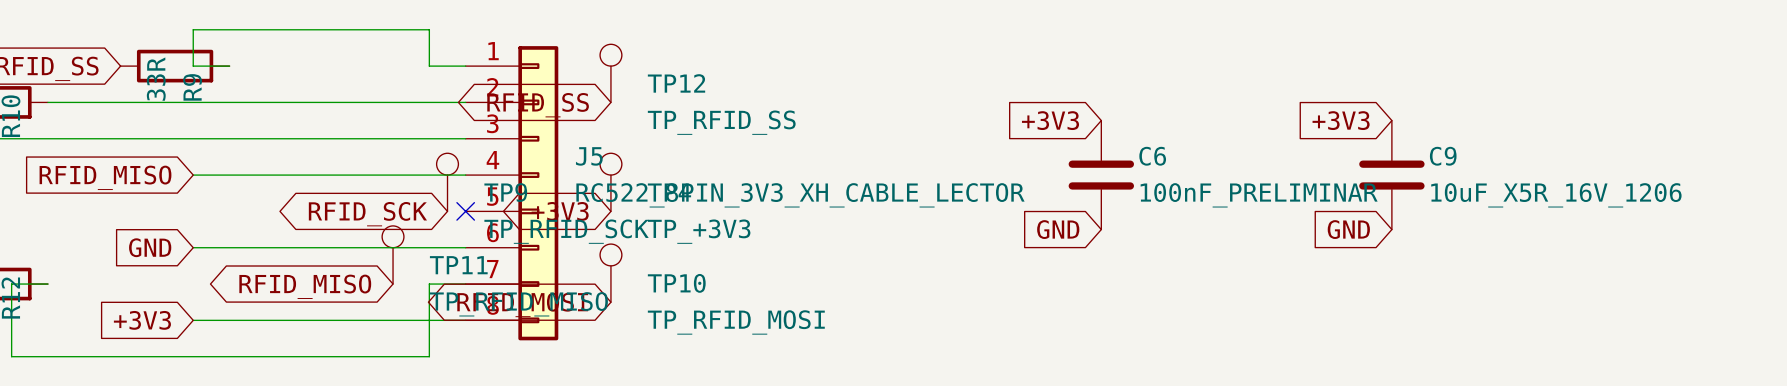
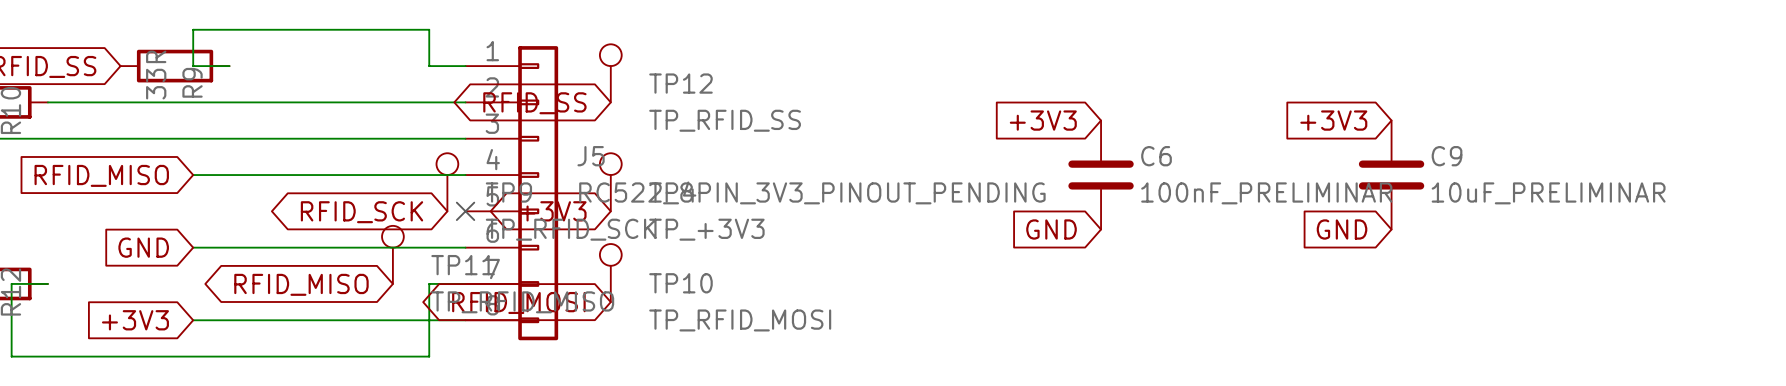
J5 value: RC522_8PIN_3V3_XH_CABLE_LECTOR (800, 195) -> RC522_8PIN_3V3_PINOUT_PENDING (812, 193)
C9 value: 10uF_X5R_16V_1206 (1556, 195) -> 10uF_PRELIMINAR (1548, 193)

